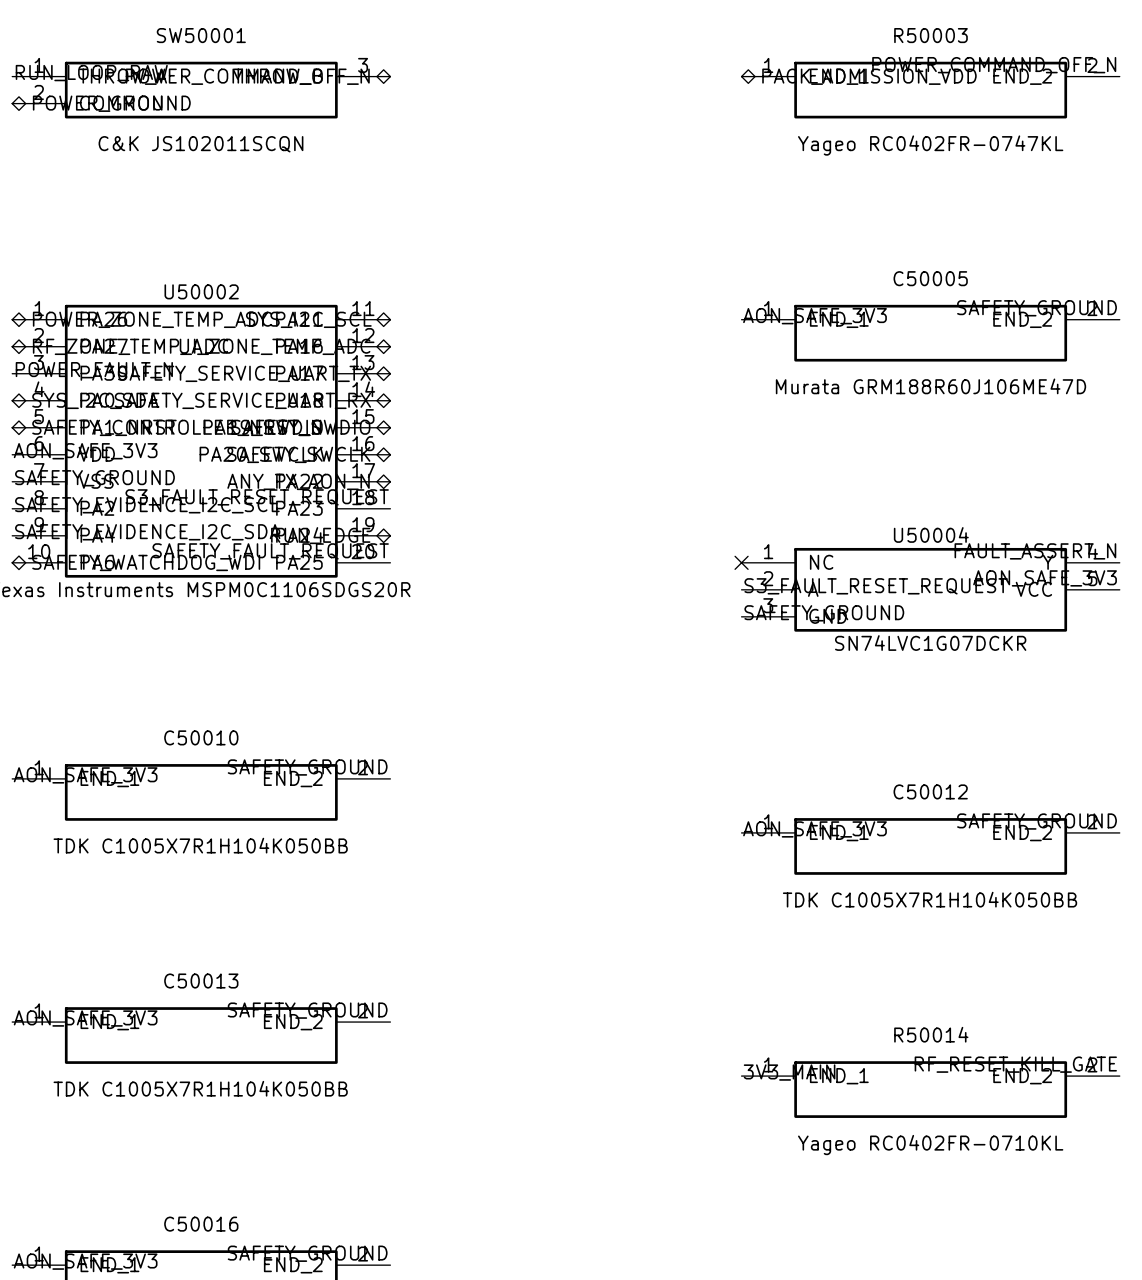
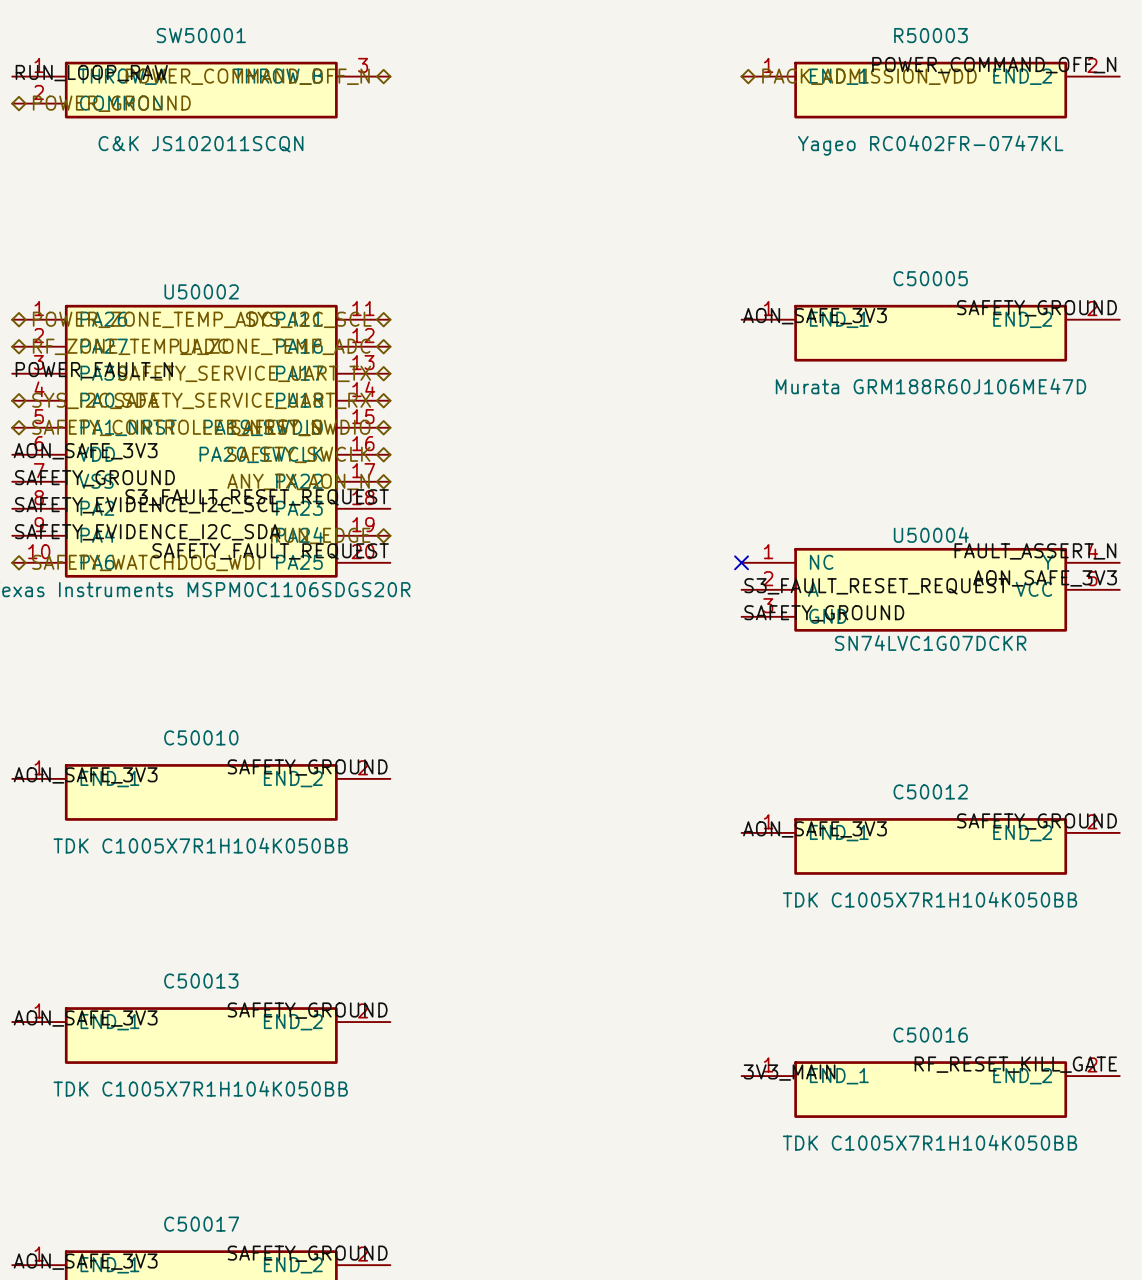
R50014 name: R50014 (931, 1034) -> C50016 (930, 1035)
R50014 value: Yageo RC0402FR-0710KL (930, 1145) -> TDK C1005X7R1H104K050BB (930, 1142)
C50016 name: C50016 (201, 1224) -> C50017 (201, 1224)

